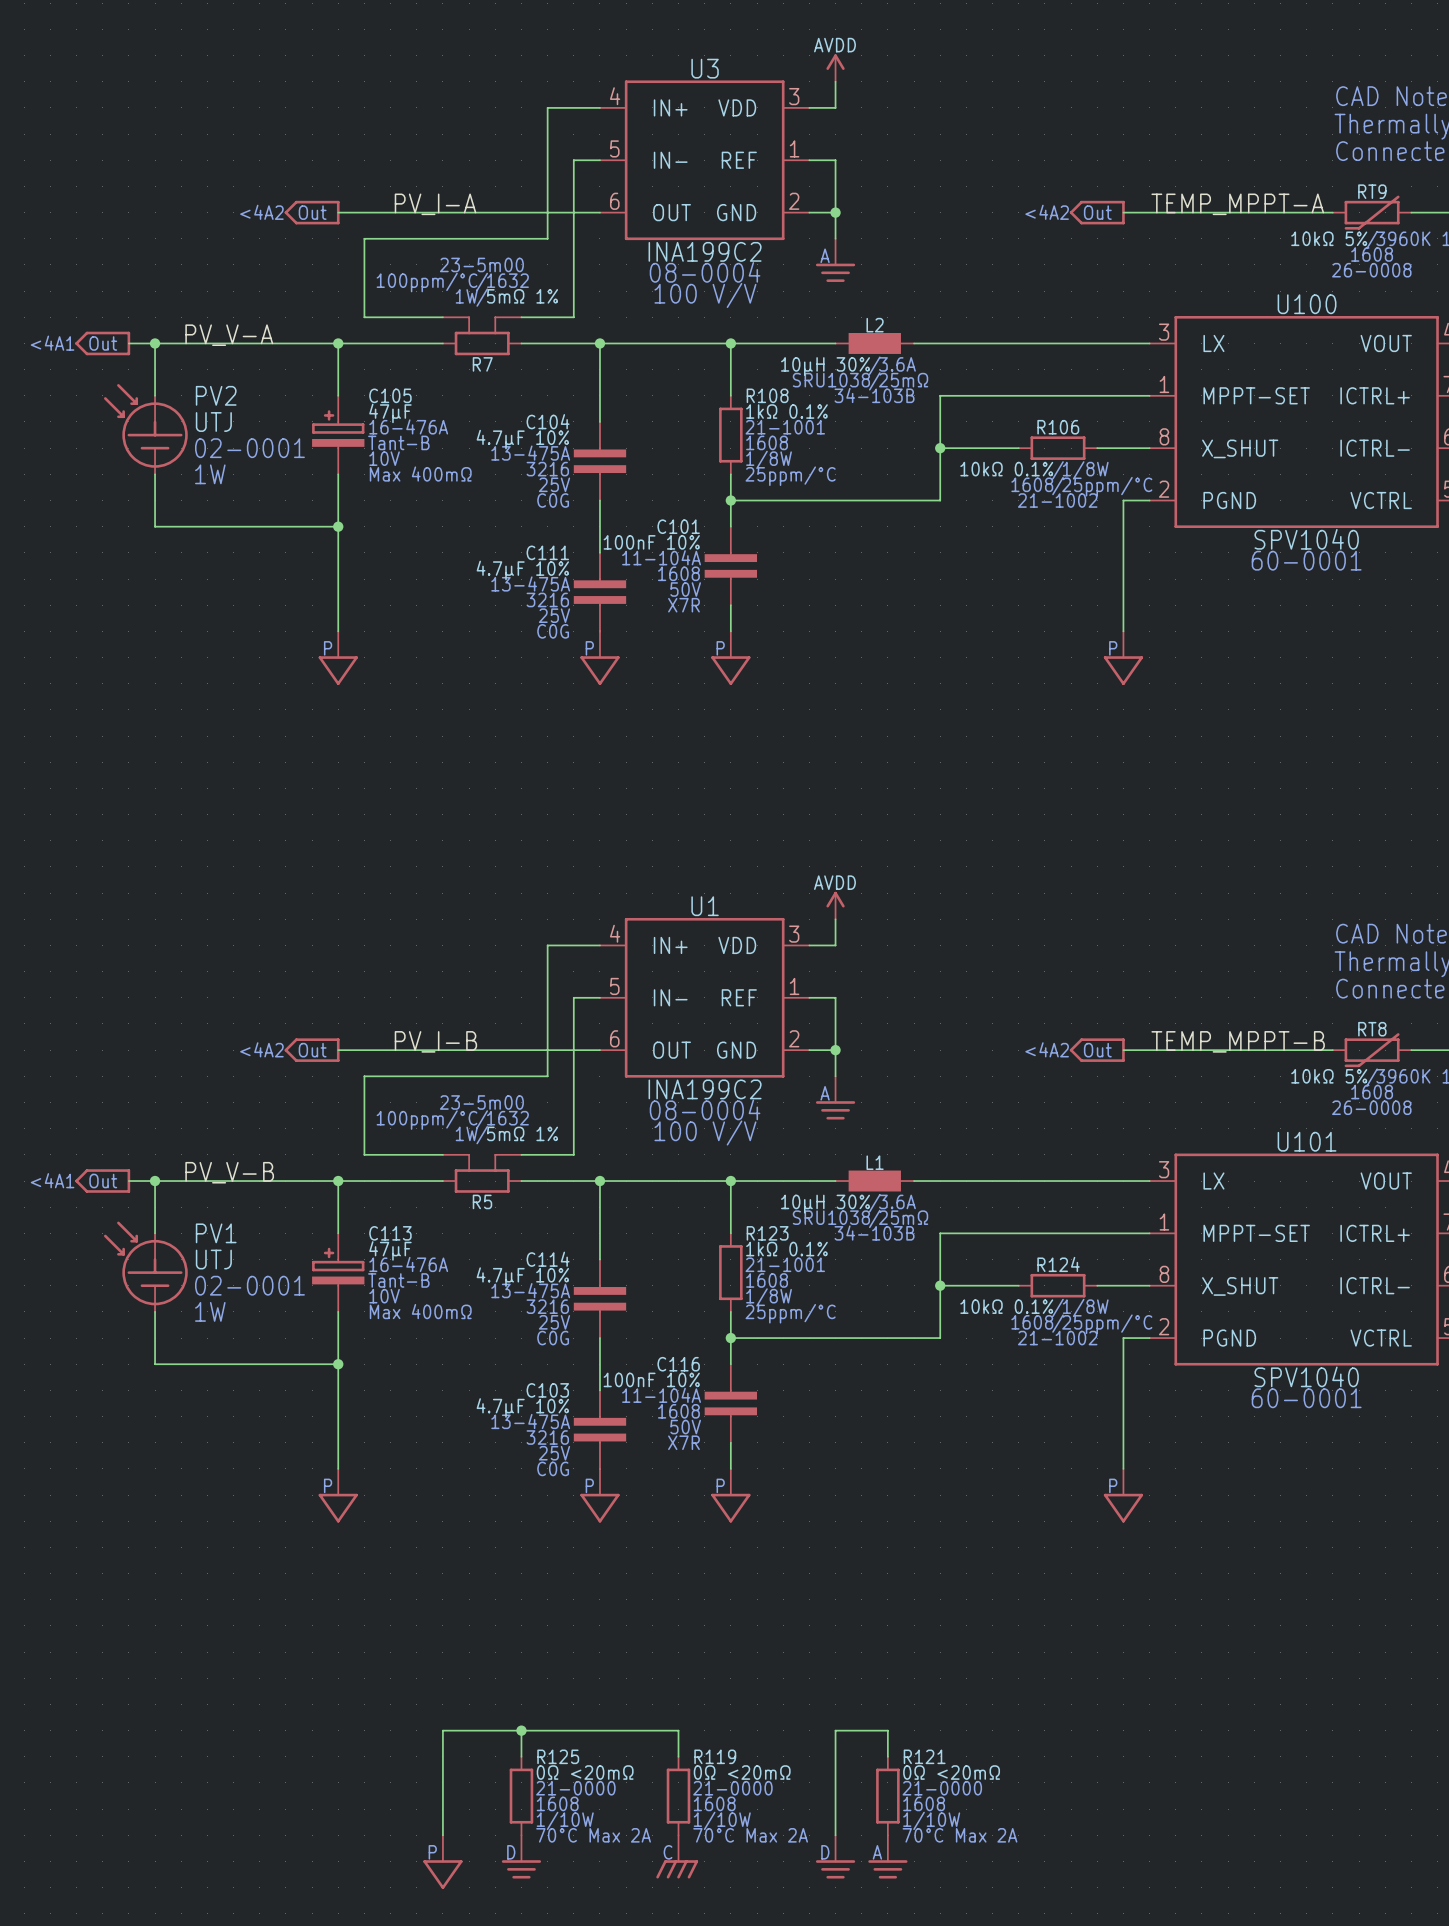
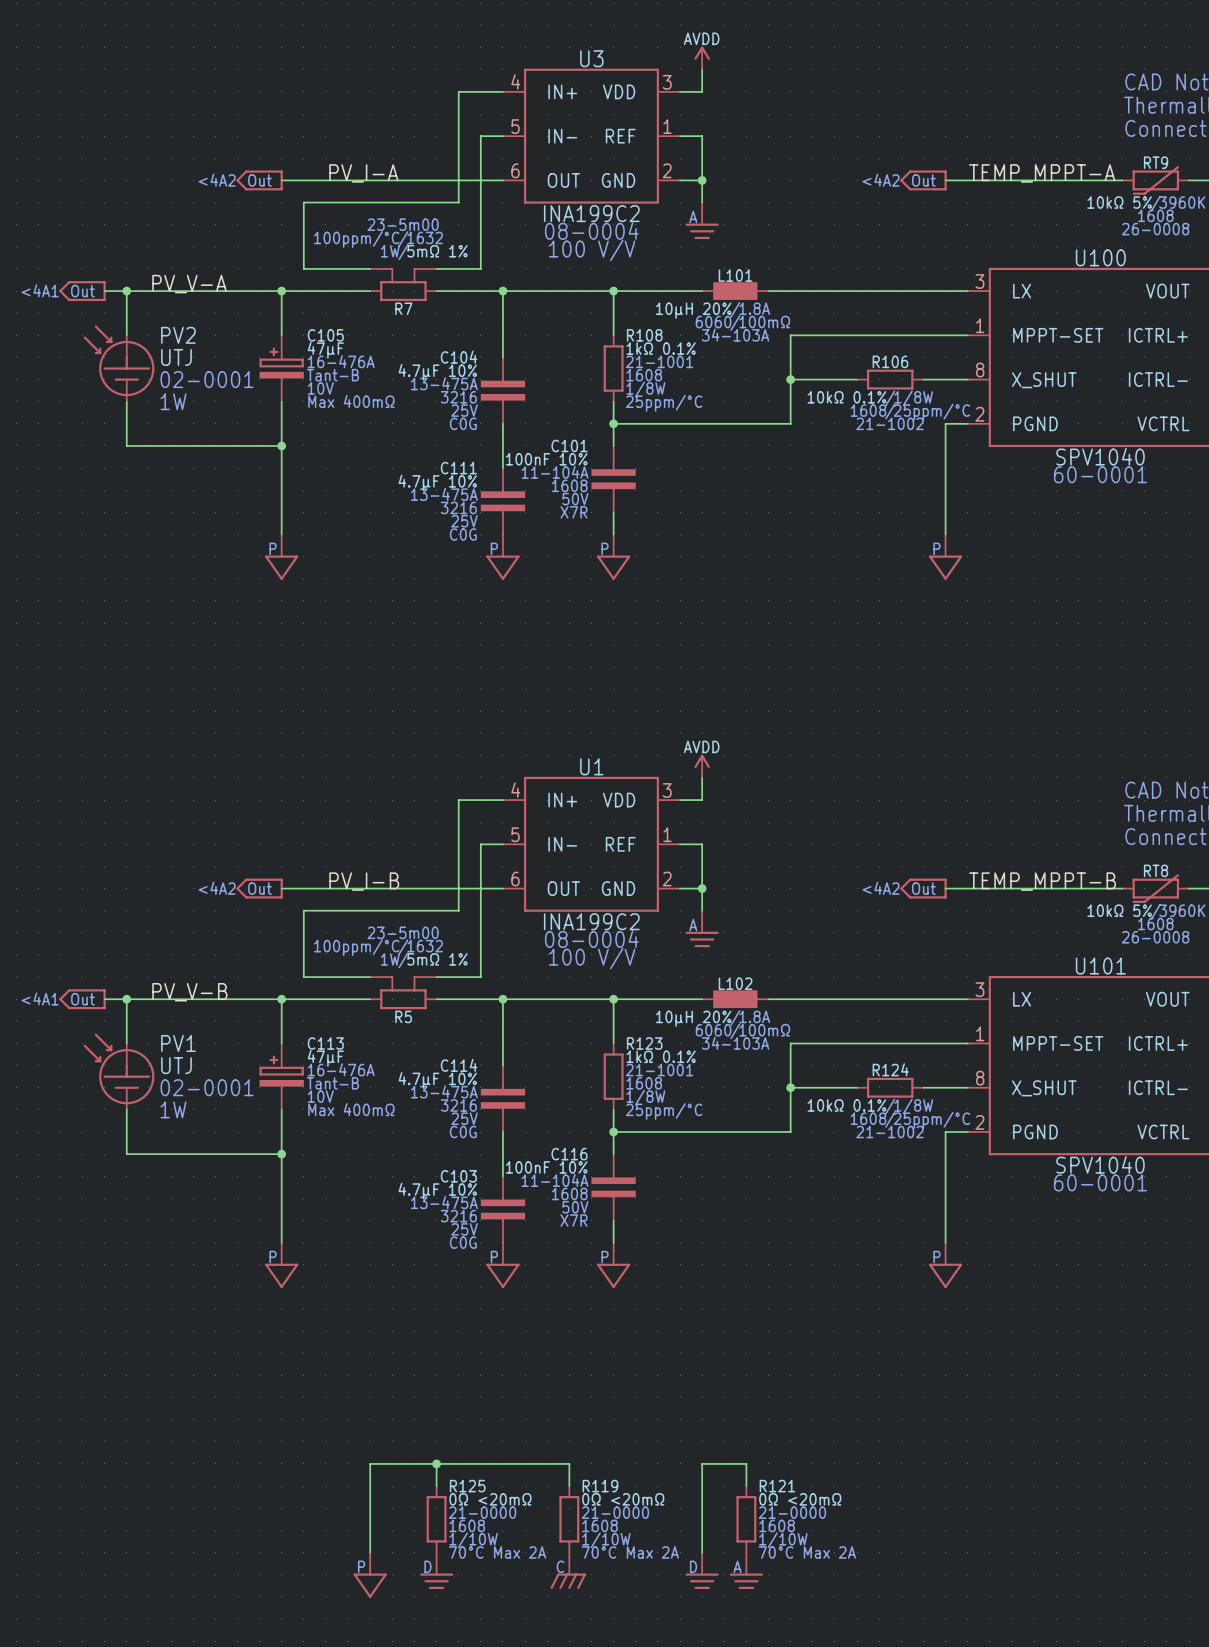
L2 name: L2 (875, 325) -> L101 (735, 275)
L2 text: 3.6A (897, 364) -> 1.8A (754, 308)
L2 value: 10µH 30% (825, 366) -> 10µH 20% (693, 310)
L2 text: SRU1038 (831, 380) -> 6060 (713, 322)
L2 text: 25mΩ (903, 380) -> 100mΩ (764, 322)
L2 text: 34-103B (874, 395) -> 34-103A (735, 335)
L1 name: L1 (875, 1162) -> L102 (735, 983)
L1 text: 3.6A (897, 1201) -> 1.8A (754, 1016)
L1 value: 10µH 30% (825, 1204) -> 10µH 20% (693, 1018)
L1 text: SRU1038 (831, 1217) -> 6060 (713, 1030)
L1 text: 25mΩ (903, 1217) -> 100mΩ (764, 1030)
L1 text: 34-103B (874, 1233) -> 34-103A (735, 1043)

